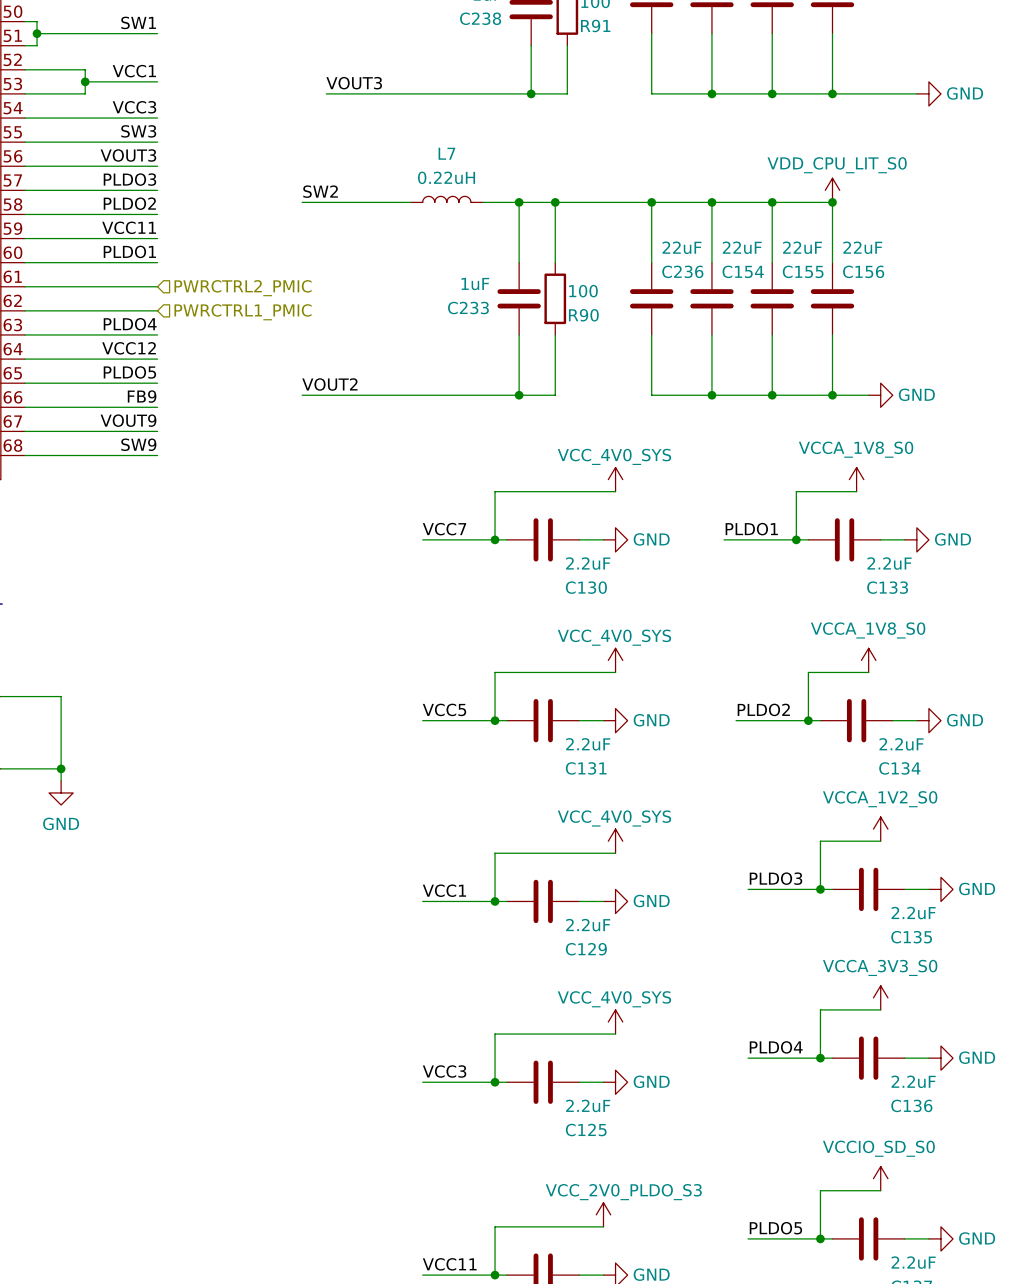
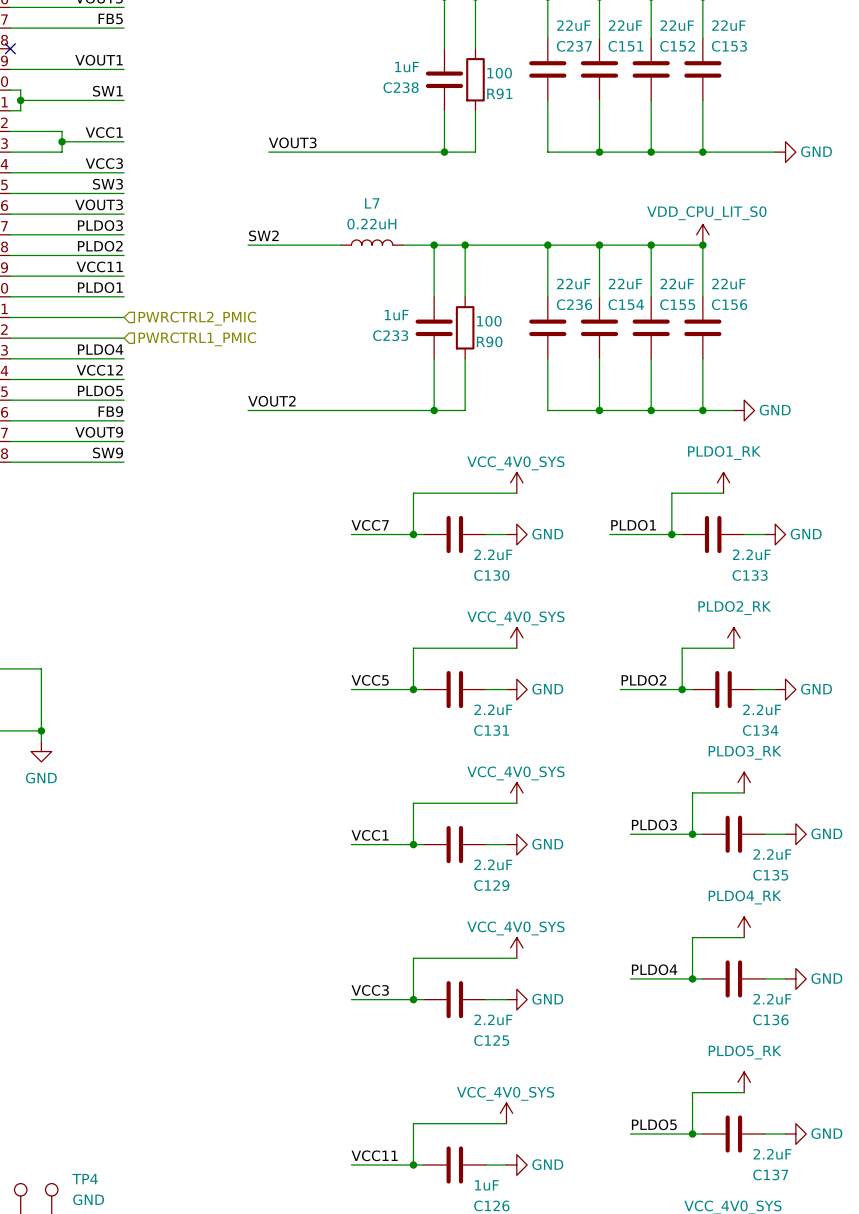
power symbol: VCCA_1V8_S0 (856, 479) -> PLDO1_RK (723, 482)
power symbol: VCCA_1V8_S0 (868, 660) -> PLDO2_RK (733, 637)
power symbol: VCCA_1V2_S0 (880, 829) -> PLDO3_RK (744, 782)
power symbol: VCCA_3V3_S0 (880, 997) -> PLDO4_RK (744, 927)
power symbol: VCCIO_SD_S0 (880, 1178) -> PLDO5_RK (744, 1082)
power symbol: VCC_2V0_PLDO_S3 (603, 1214) -> VCC_4V0_SYS (506, 1113)

